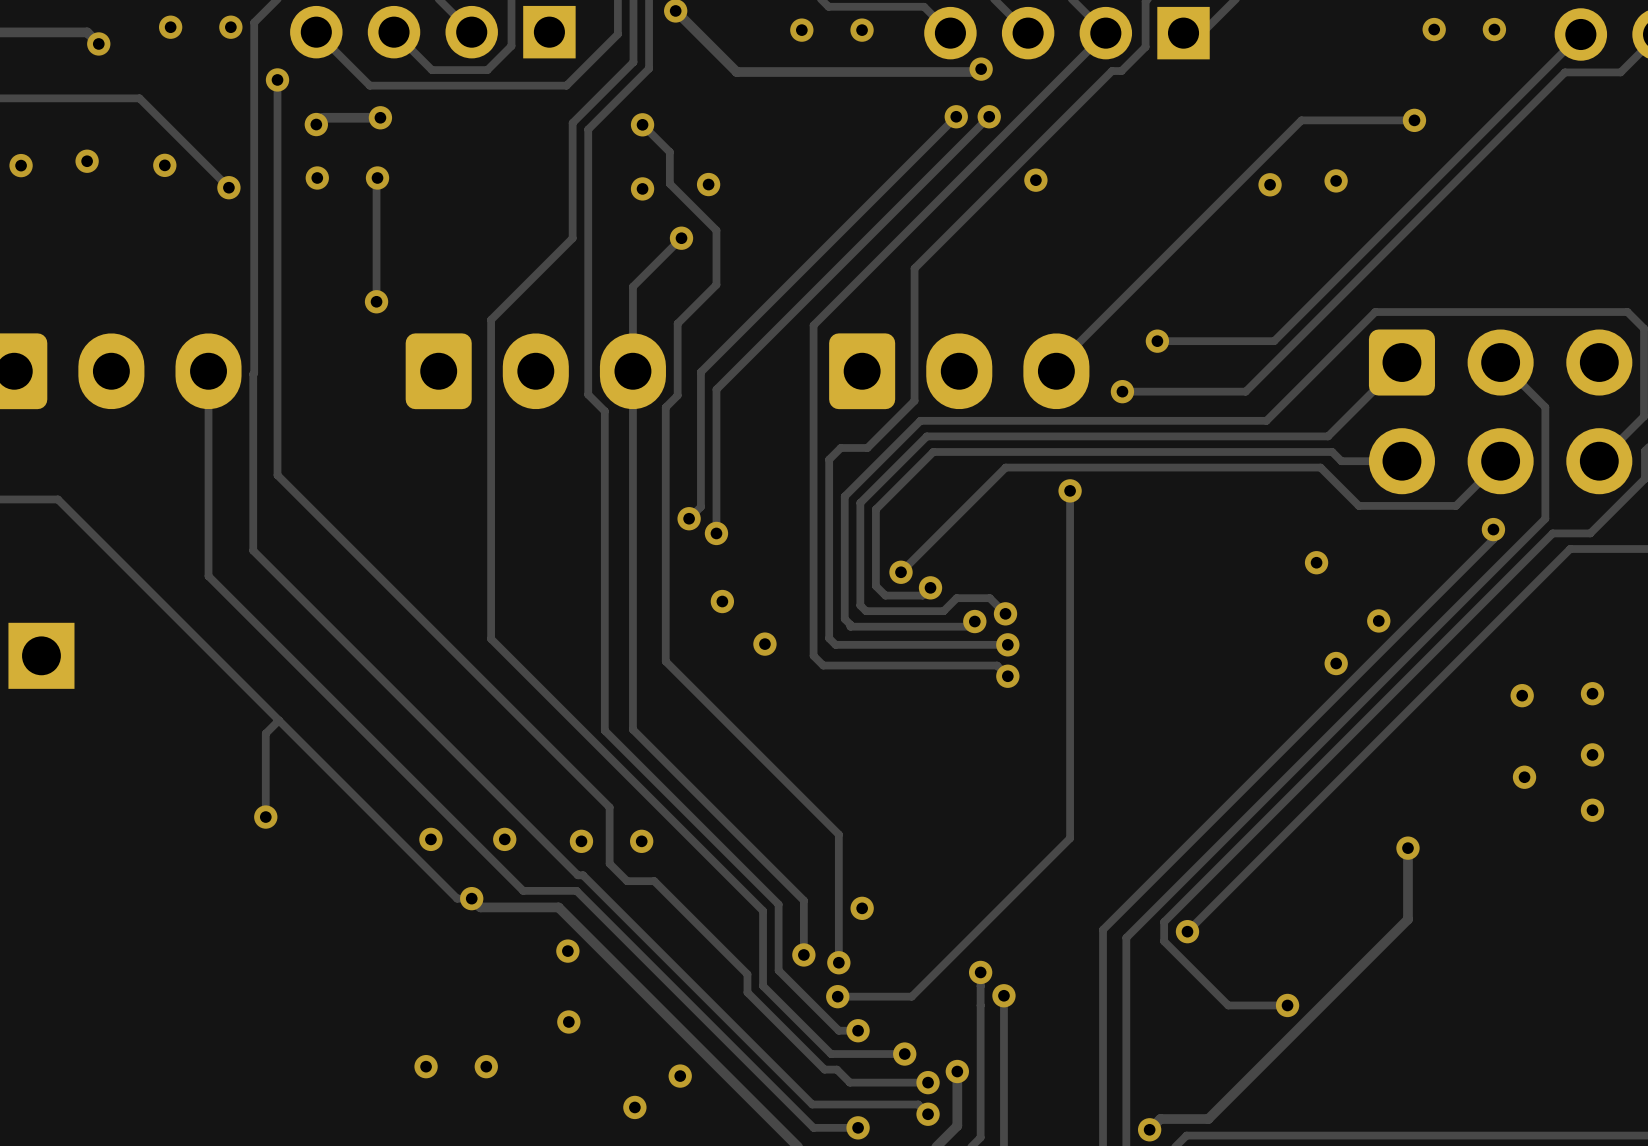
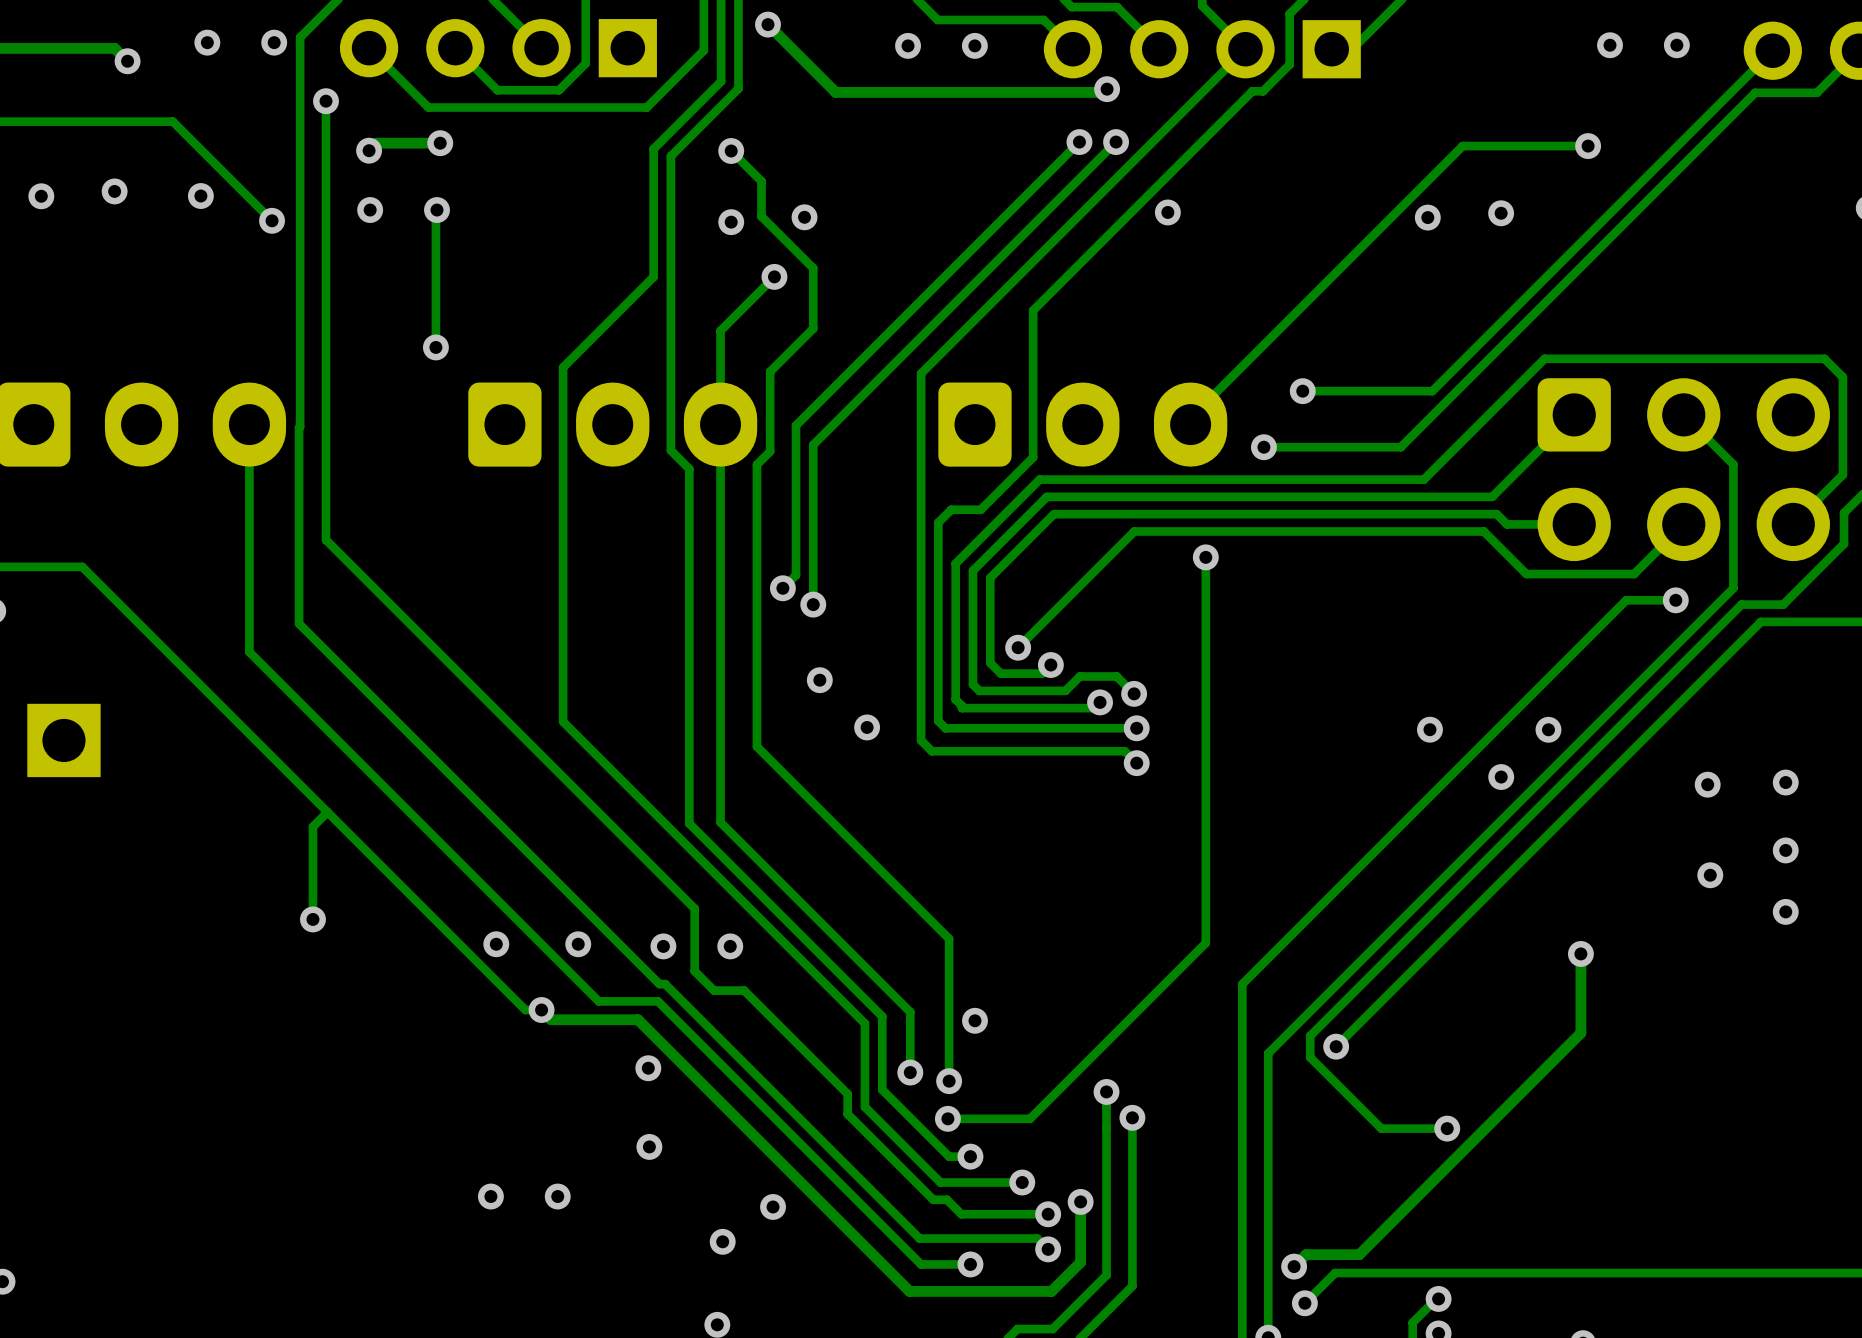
track: (1493, 529) (1493, 539) (1103, 929) -> (1675, 600) (1626, 600) (1242, 984) (1242, 1044)
via: (1316, 562) -> none
via: (1378, 620) -> none
via: none -> (1429, 729)
via: none -> (1548, 729)
via: (1336, 663) -> none
via: none -> (1501, 777)

